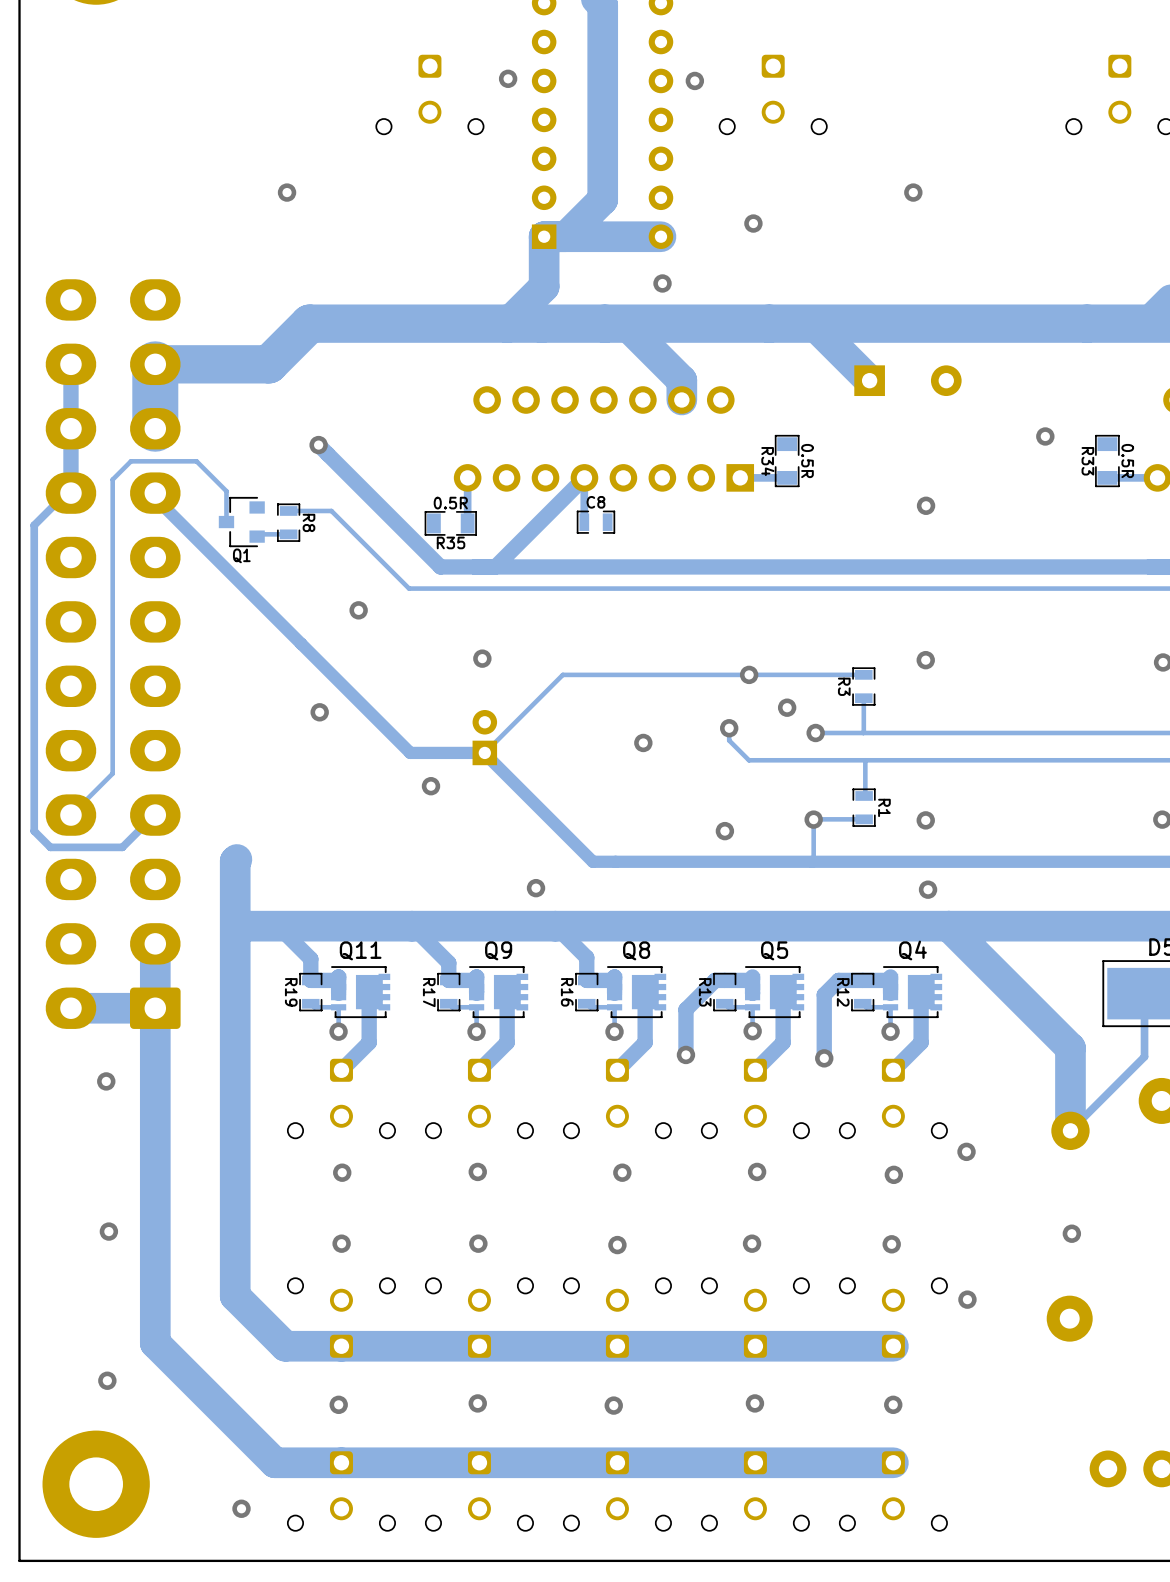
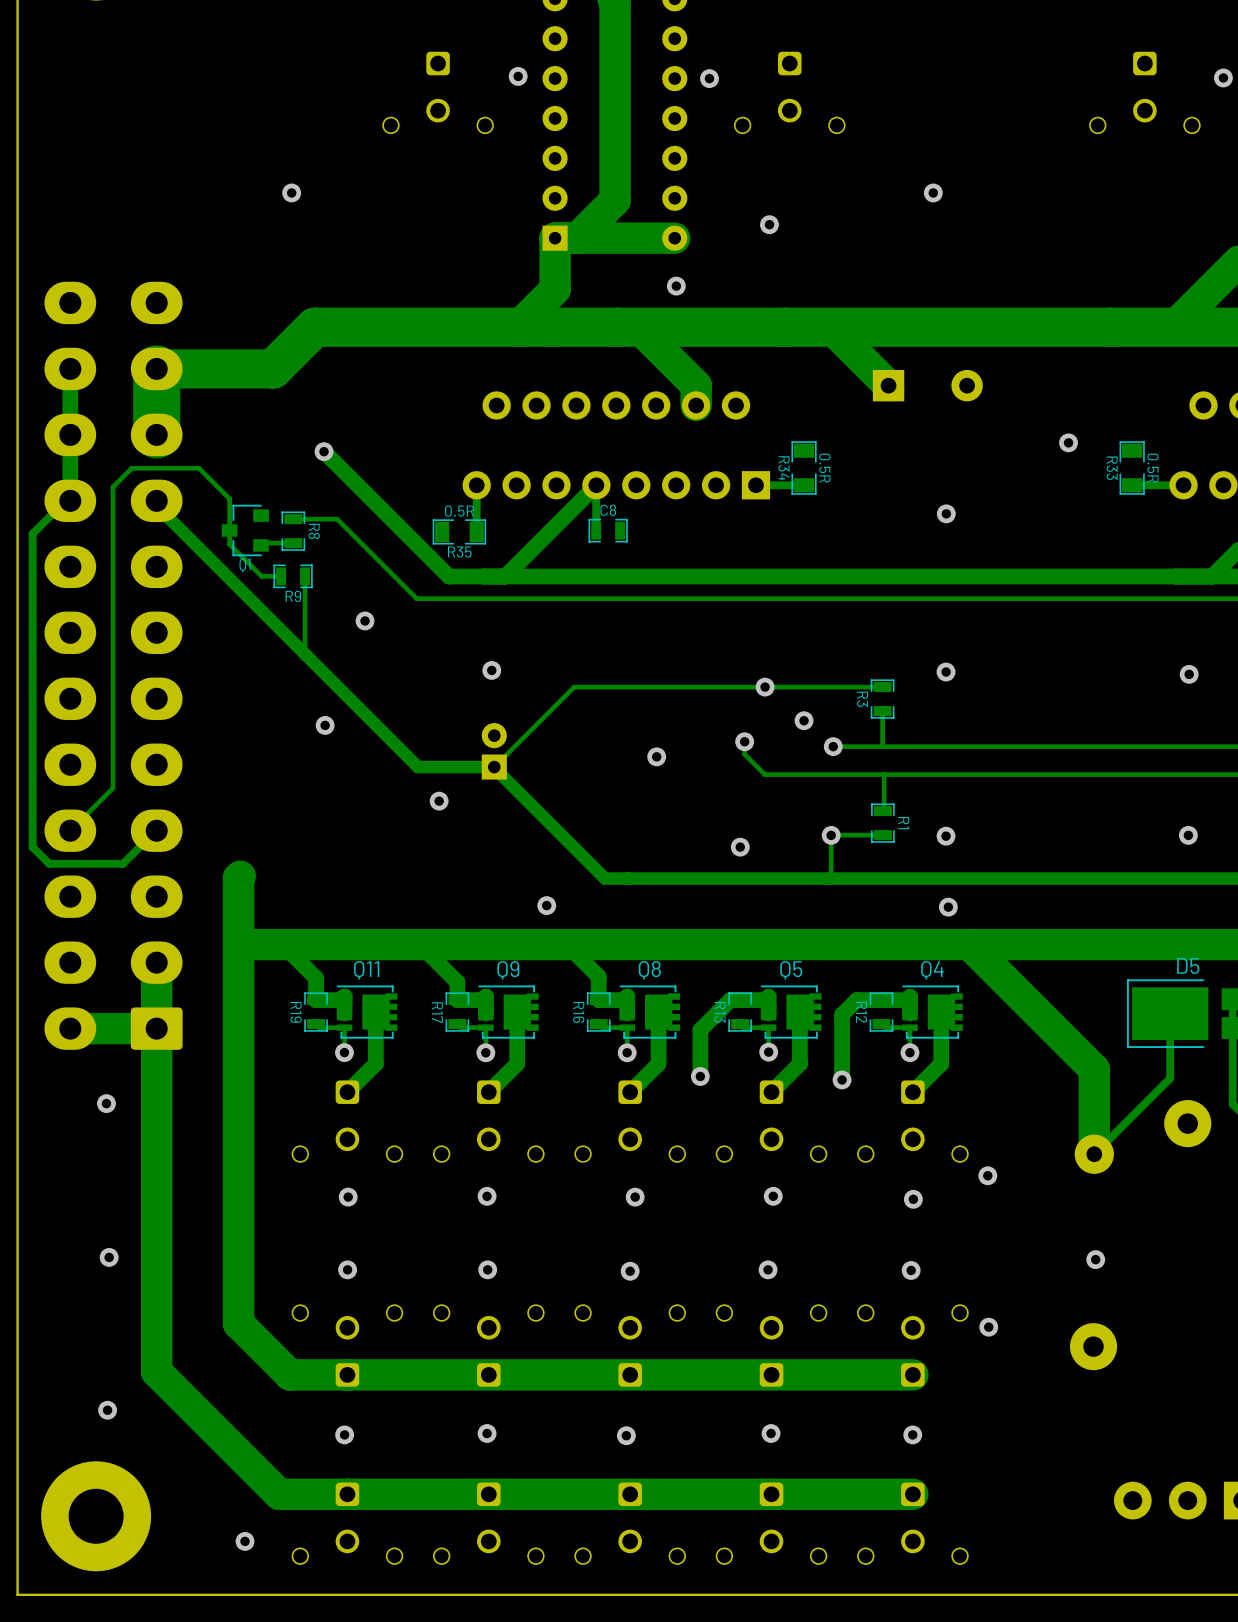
track: none -> (229, 530) (229, 544) (261, 576) (281, 576)
R9: none -> (293, 576)
track: none -> (305, 576) (306, 655)

